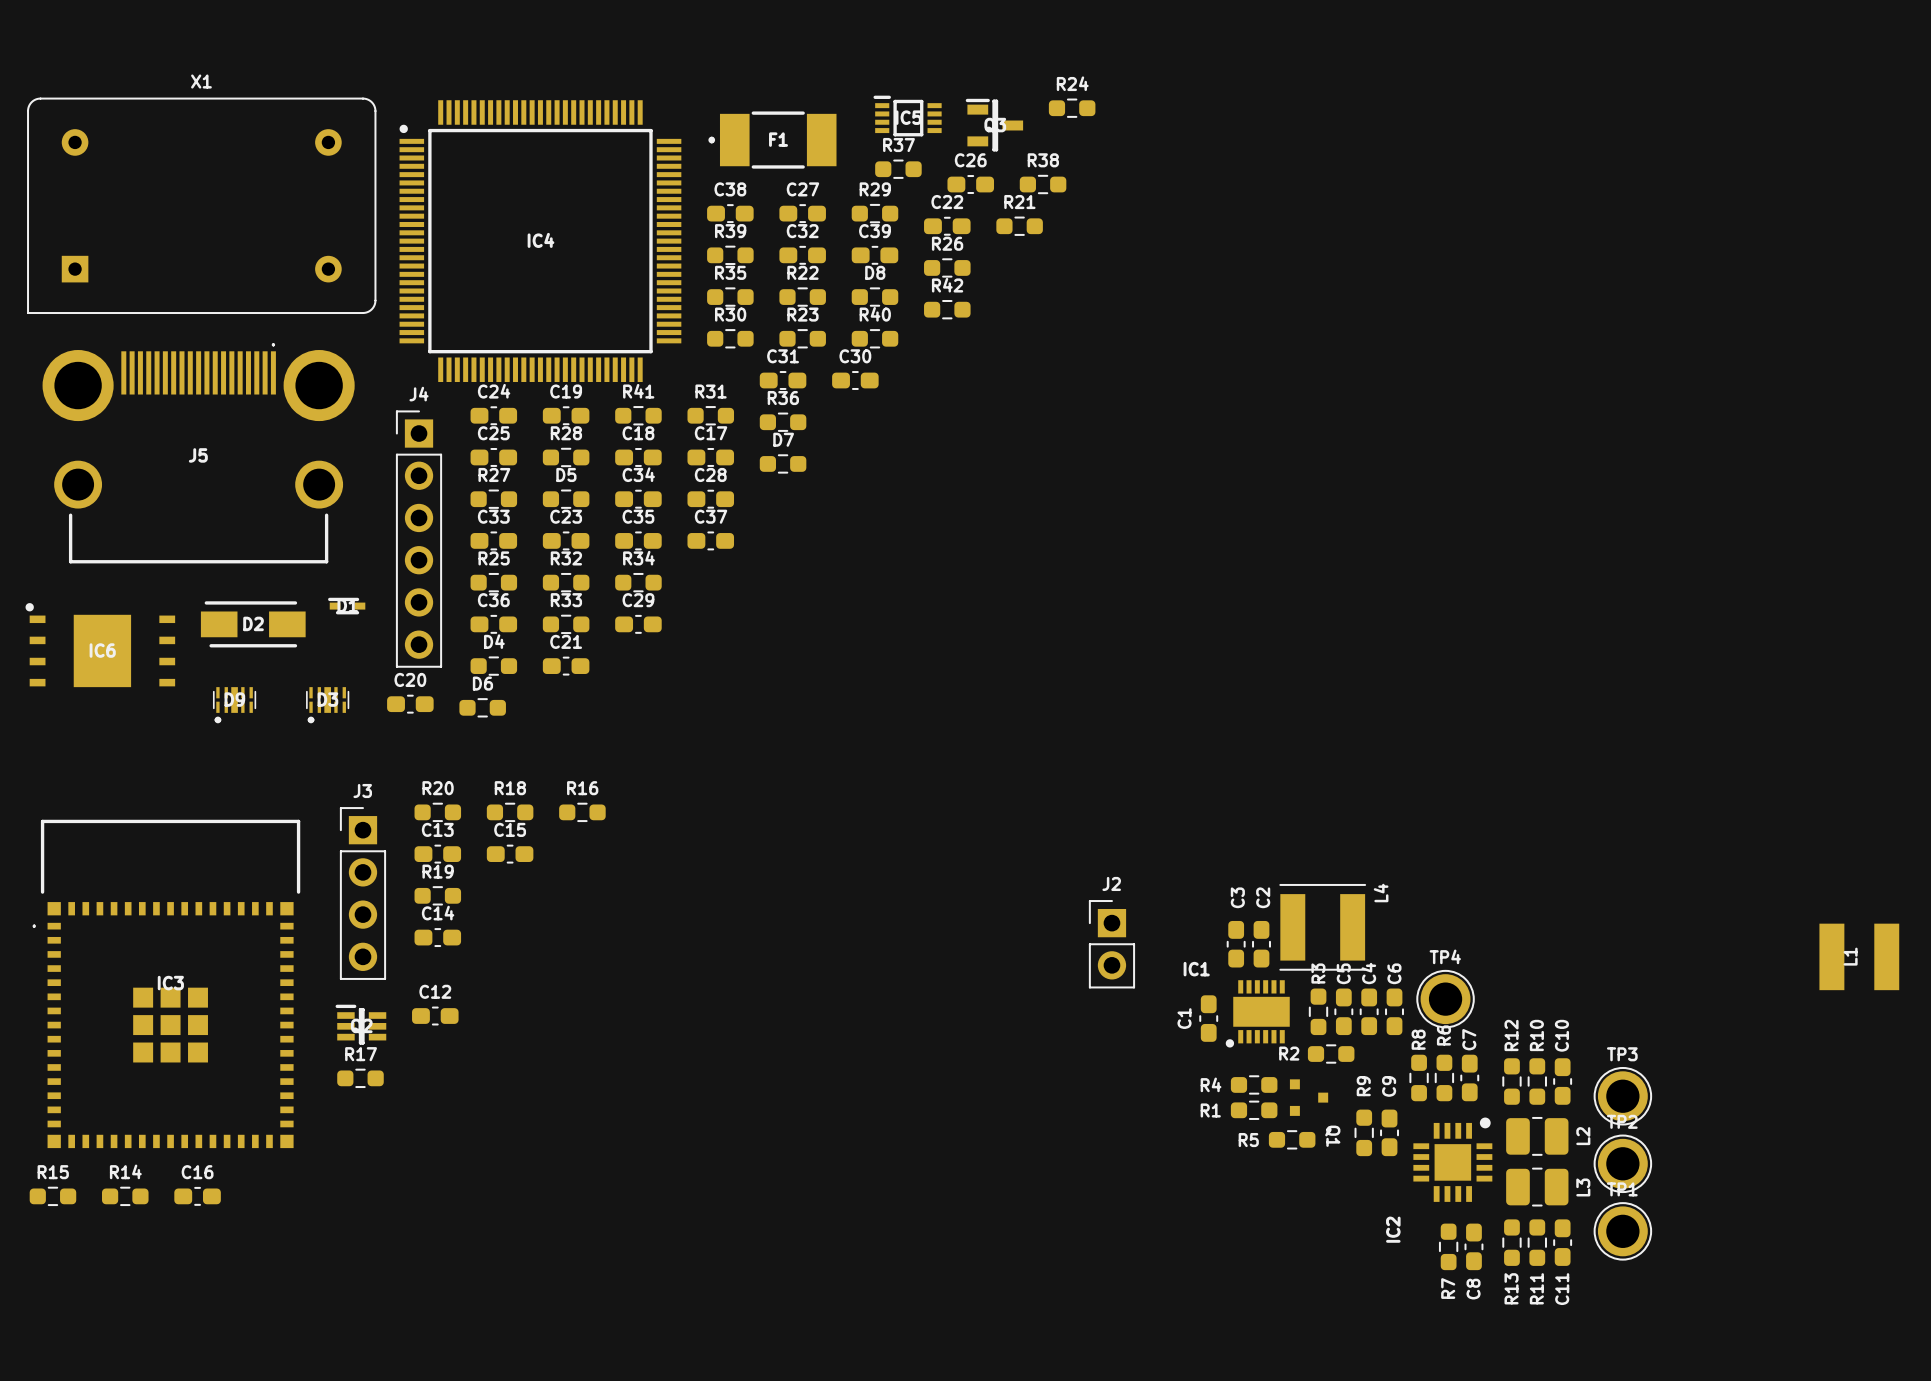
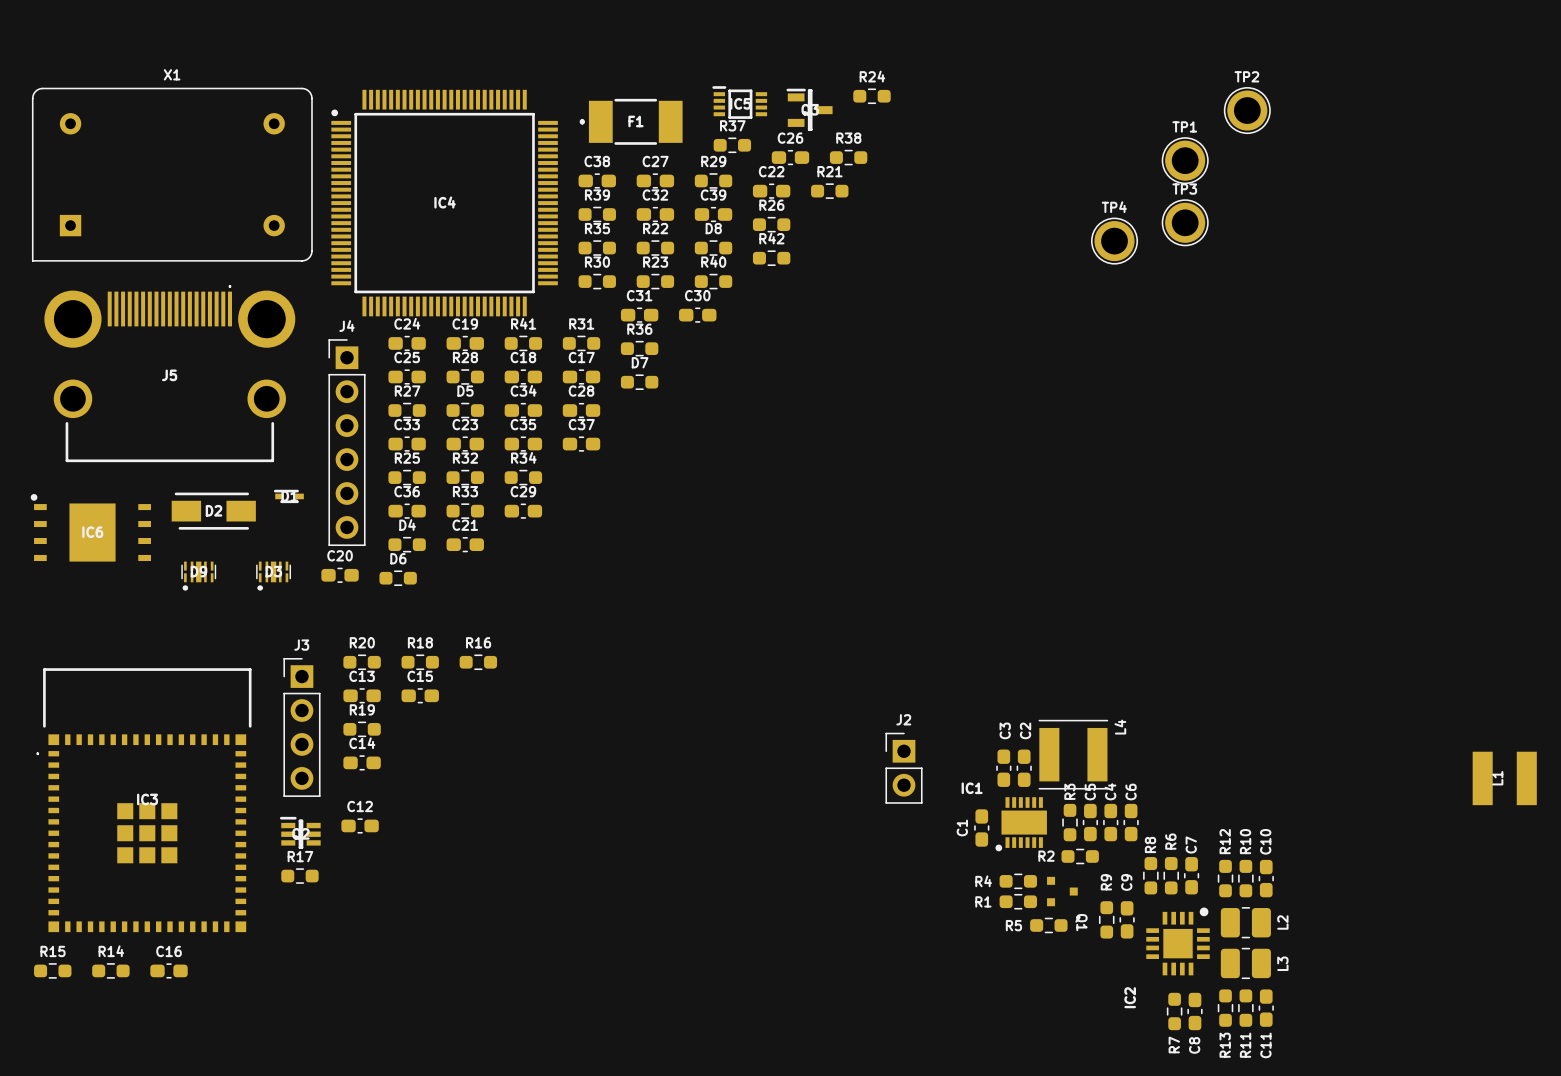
TP4 position: (1445, 999) -> (1114, 241)
TP3 position: (1622, 1096) -> (1185, 222)
TP2 position: (1622, 1163) -> (1247, 110)
TP1 position: (1622, 1231) -> (1185, 160)

